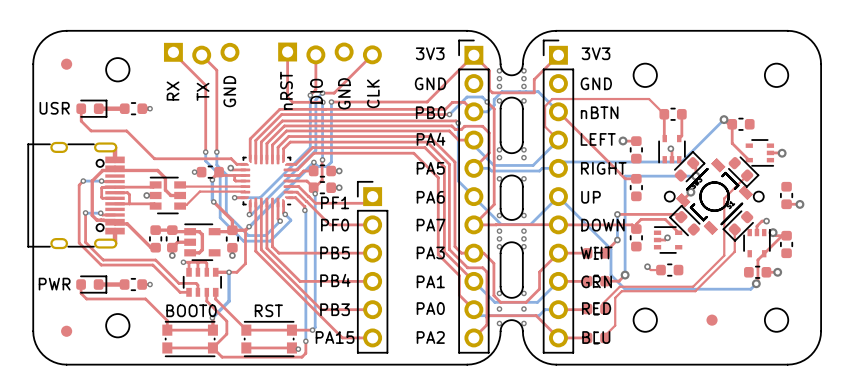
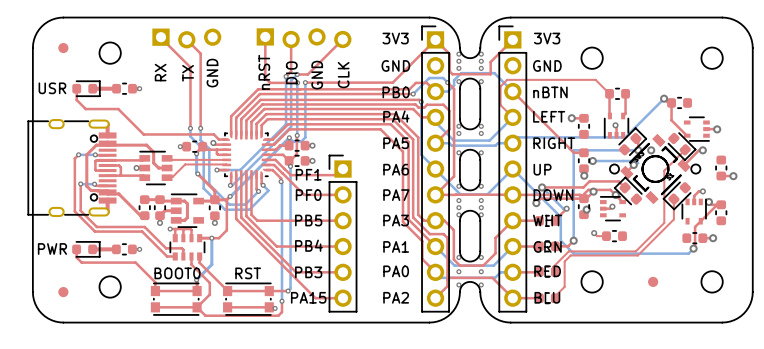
via: none -> (651, 150)
top track: none -> (702, 150) (699, 150) (683, 165)
via: none -> (702, 150)
bottom track: none -> (592, 161) (636, 161) (638, 163)
via: none -> (592, 161)
via: none -> (584, 175)
top track: (617, 214) (678, 214) -> (542, 187) (583, 187) (589, 181) (618, 181) (622, 185)
bottom track: (617, 214) (617, 240) -> none
via: (617, 214) -> none
bottom track: none -> (542, 187) (563, 208)
via: none -> (542, 187)
top track: none -> (593, 191) (586, 198) (540, 198) (536, 203)
via: none -> (593, 191)
via: none -> (615, 194)
via: none -> (536, 203)
via: none -> (586, 209)

